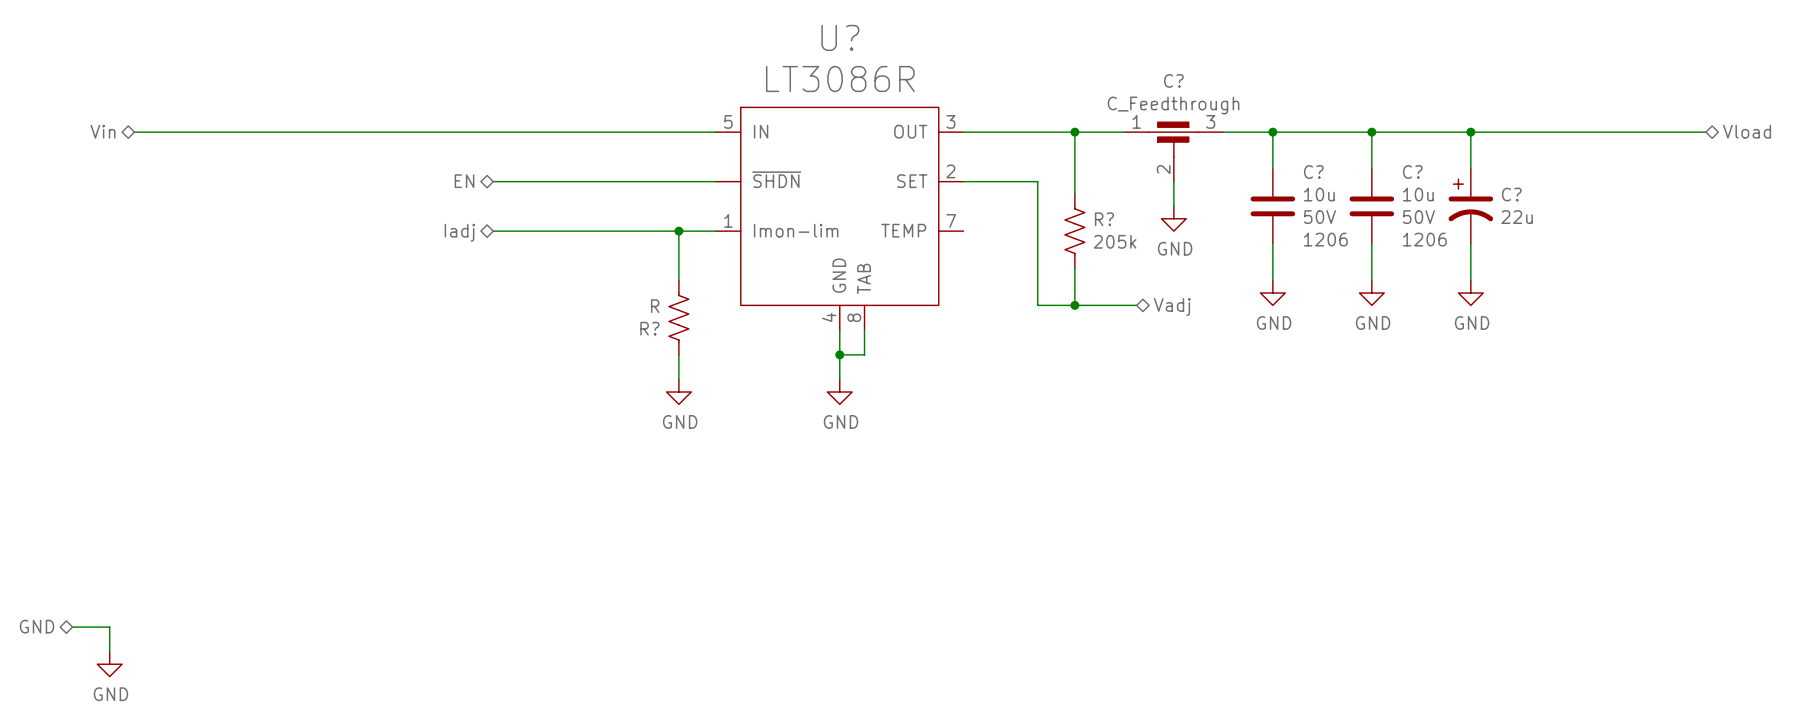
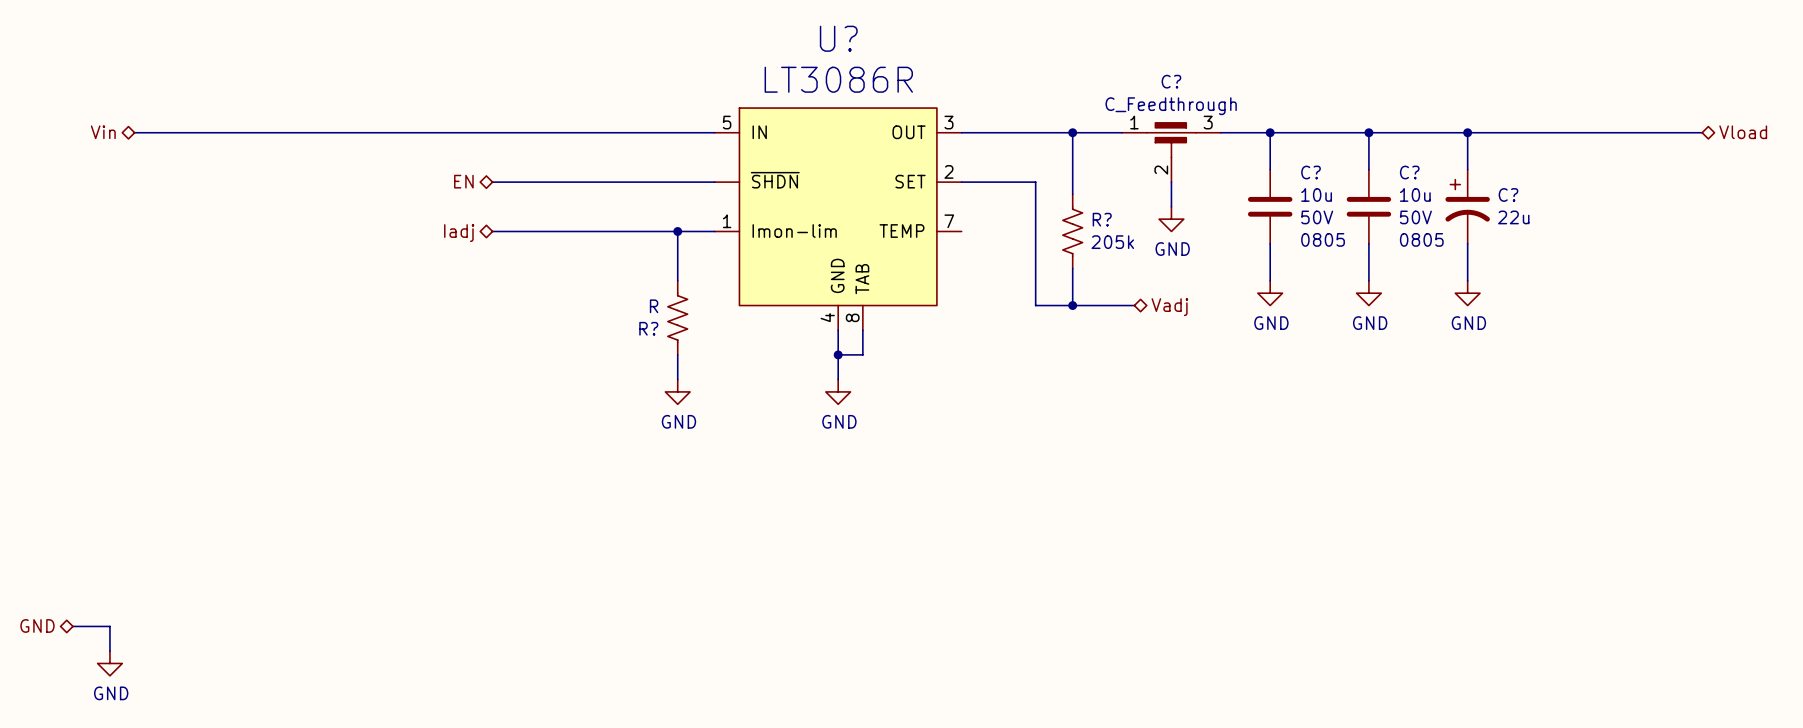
C? text: 1206 (1325, 239) -> 0805 (1323, 239)
C? text: 1206 (1424, 239) -> 0805 (1421, 239)

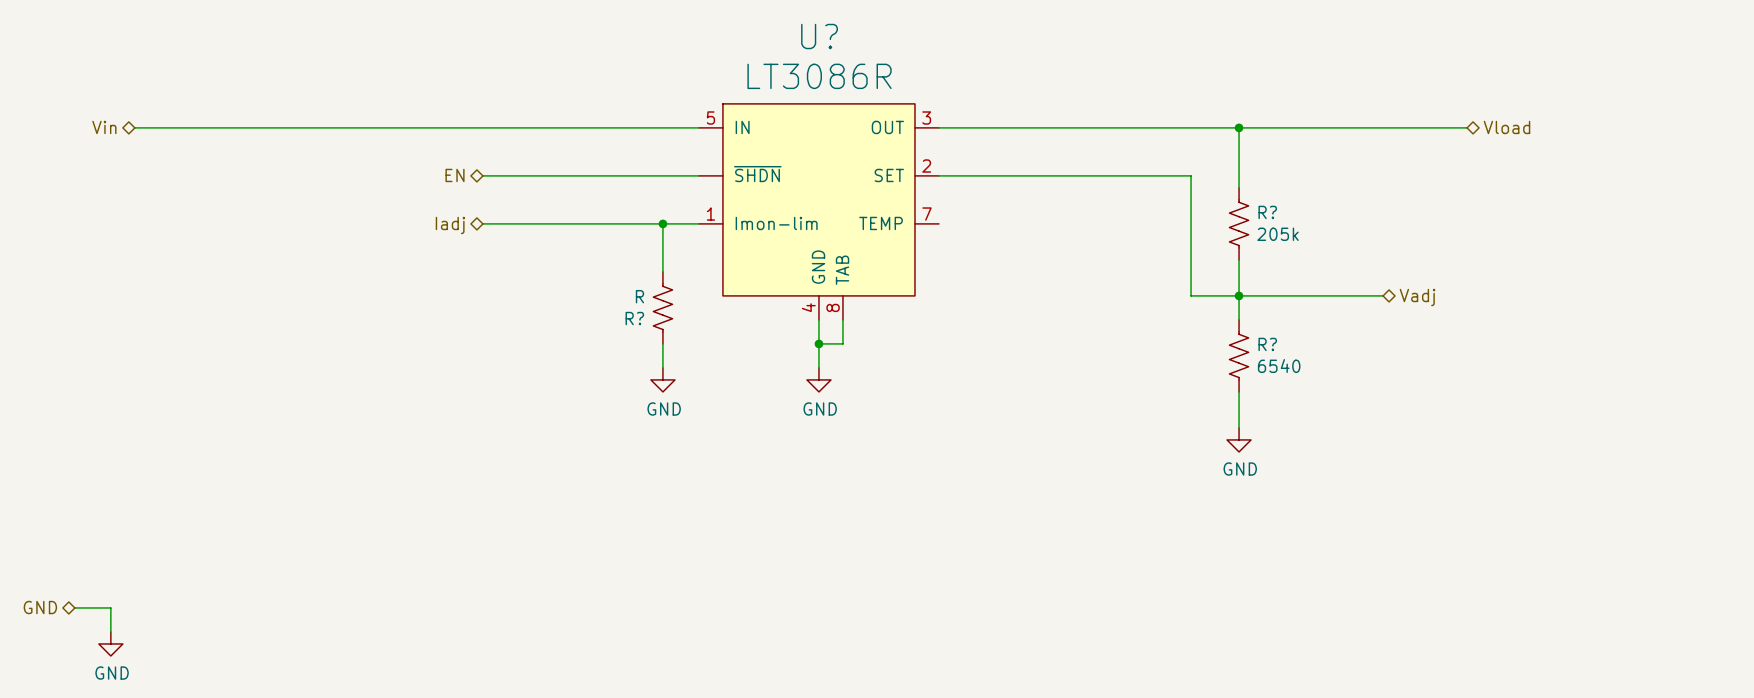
wire: (1072, 132) (1072, 194) -> none
junction: (1072, 132) -> none
wire: (1368, 132) (1368, 169) -> none
junction: (1368, 132) -> none
wire: (1467, 132) (1467, 169) -> none
junction: (1467, 132) -> none
wire: (1504, 132) (1702, 132) -> none
hierarchical label position: Vload (1743, 132) -> Vload (1506, 127)
C?: C_Feedthrough (1171, 152) -> none
wire: (1035, 182) (1035, 305) (1134, 305) -> (1011, 175) (1191, 175) (1191, 295) (1383, 295)
wire: (1171, 182) (1171, 206) -> none
C?: 10u (1270, 206) -> none
C?: 10u (1368, 206) -> none
C?: 22u (1467, 206) -> none
power symbol: GND (1171, 219) -> none
R? position: (1072, 231) -> (1239, 223)
wire: (1368, 243) (1368, 280) -> (1239, 391) (1239, 427)
wire: (1467, 243) (1467, 280) -> none
wire: (1072, 268) (1072, 305) -> none
wire: none -> (1239, 271) (1239, 319)
power symbol: GND (1270, 293) -> none
power symbol: GND (1368, 293) -> none
power symbol: GND (1467, 293) -> none
junction: (1072, 305) -> none
junction: none -> (1239, 295)
hierarchical label: Vadj (1169, 307) -> none
hierarchical label: none -> Vadj (1417, 297)
R?: none -> 6540 (1239, 355)
power symbol: none -> GND (1239, 439)

